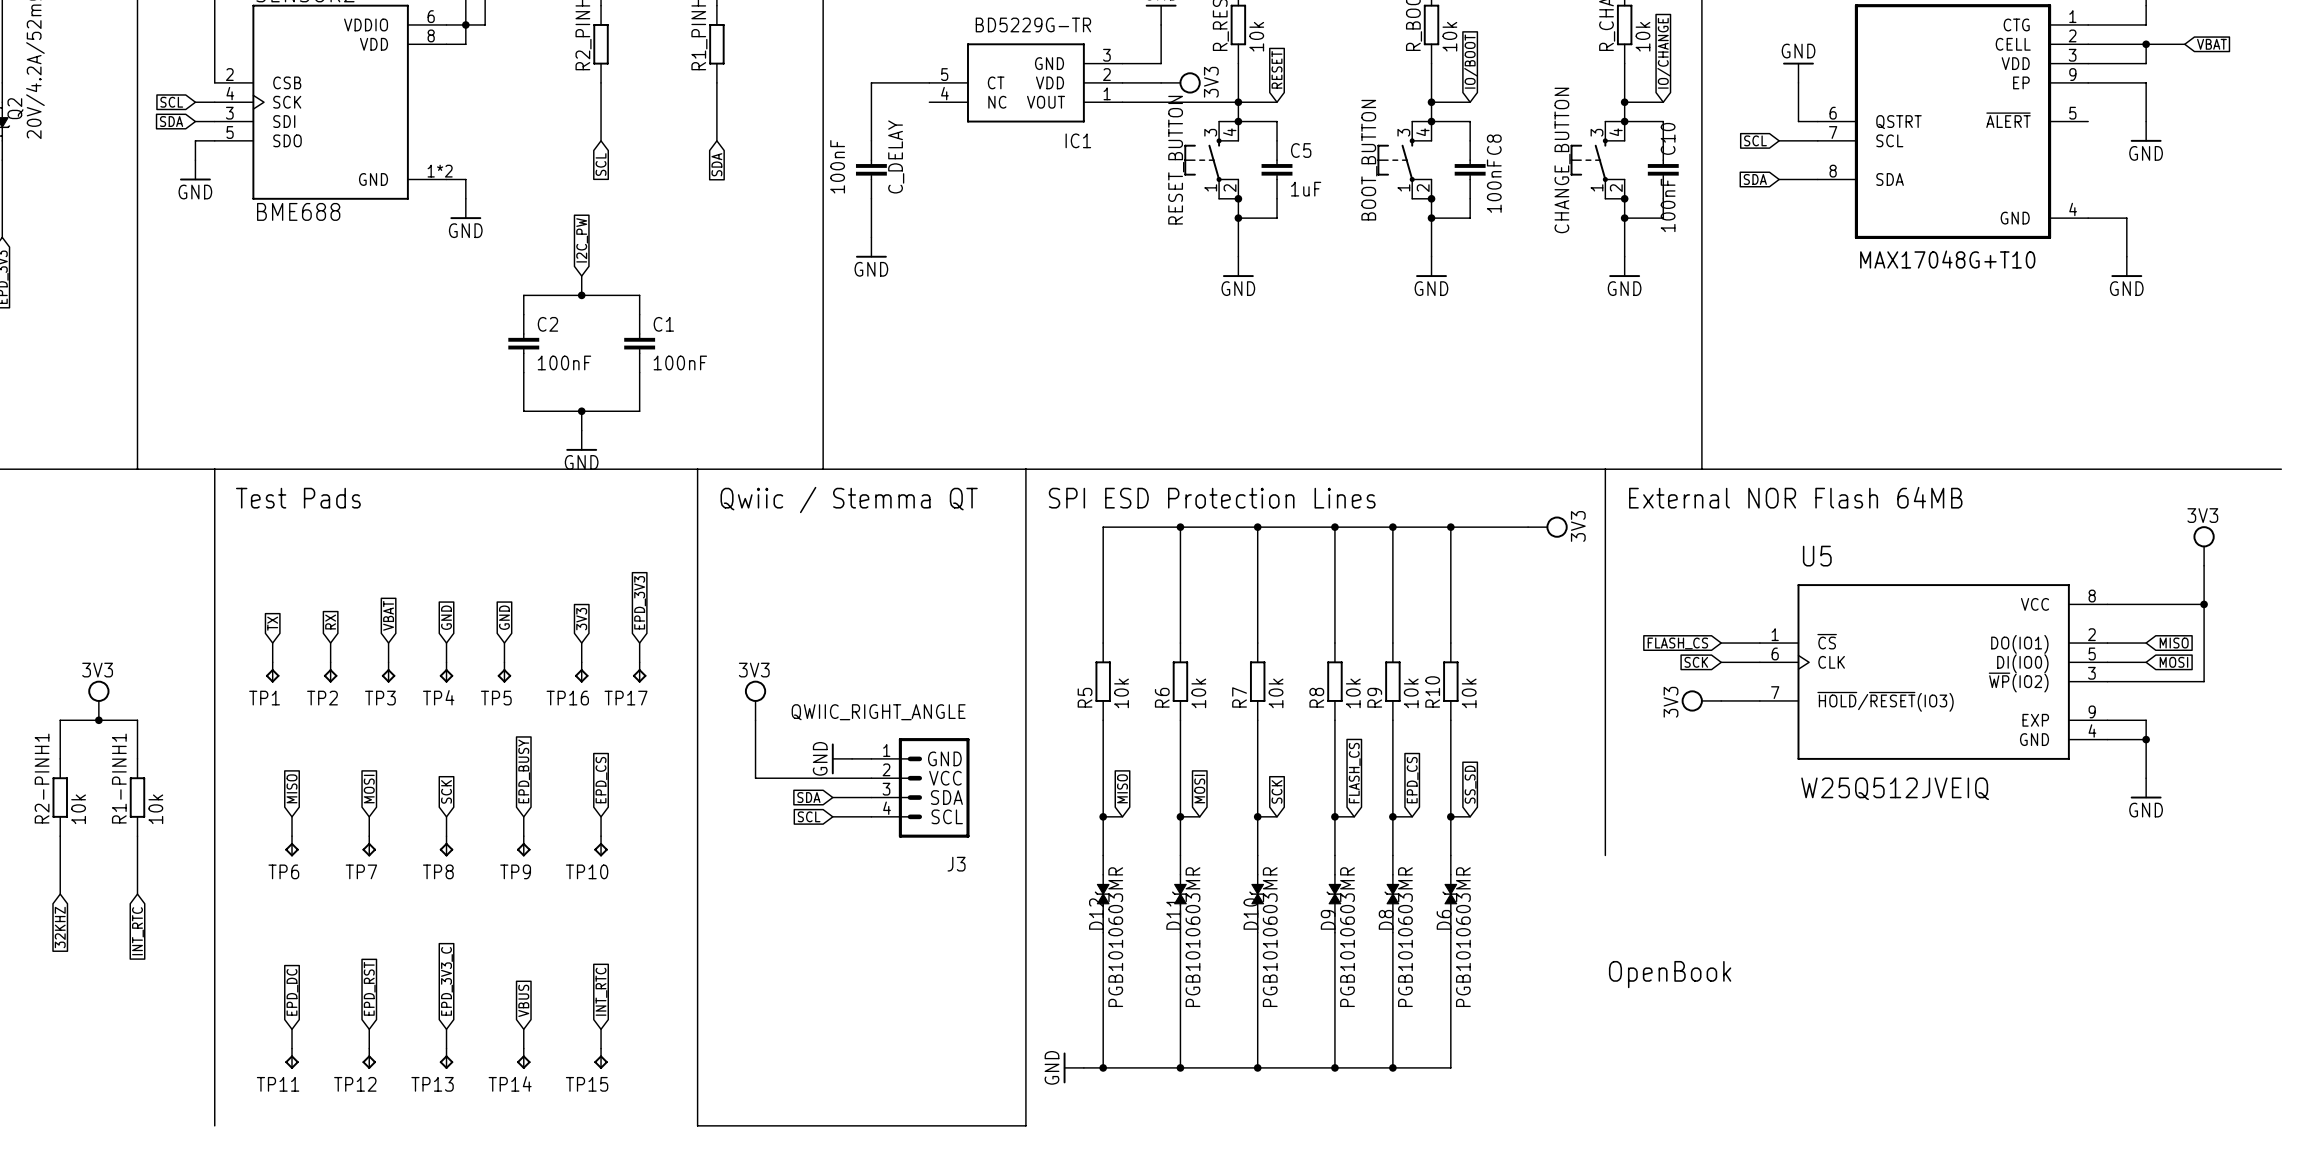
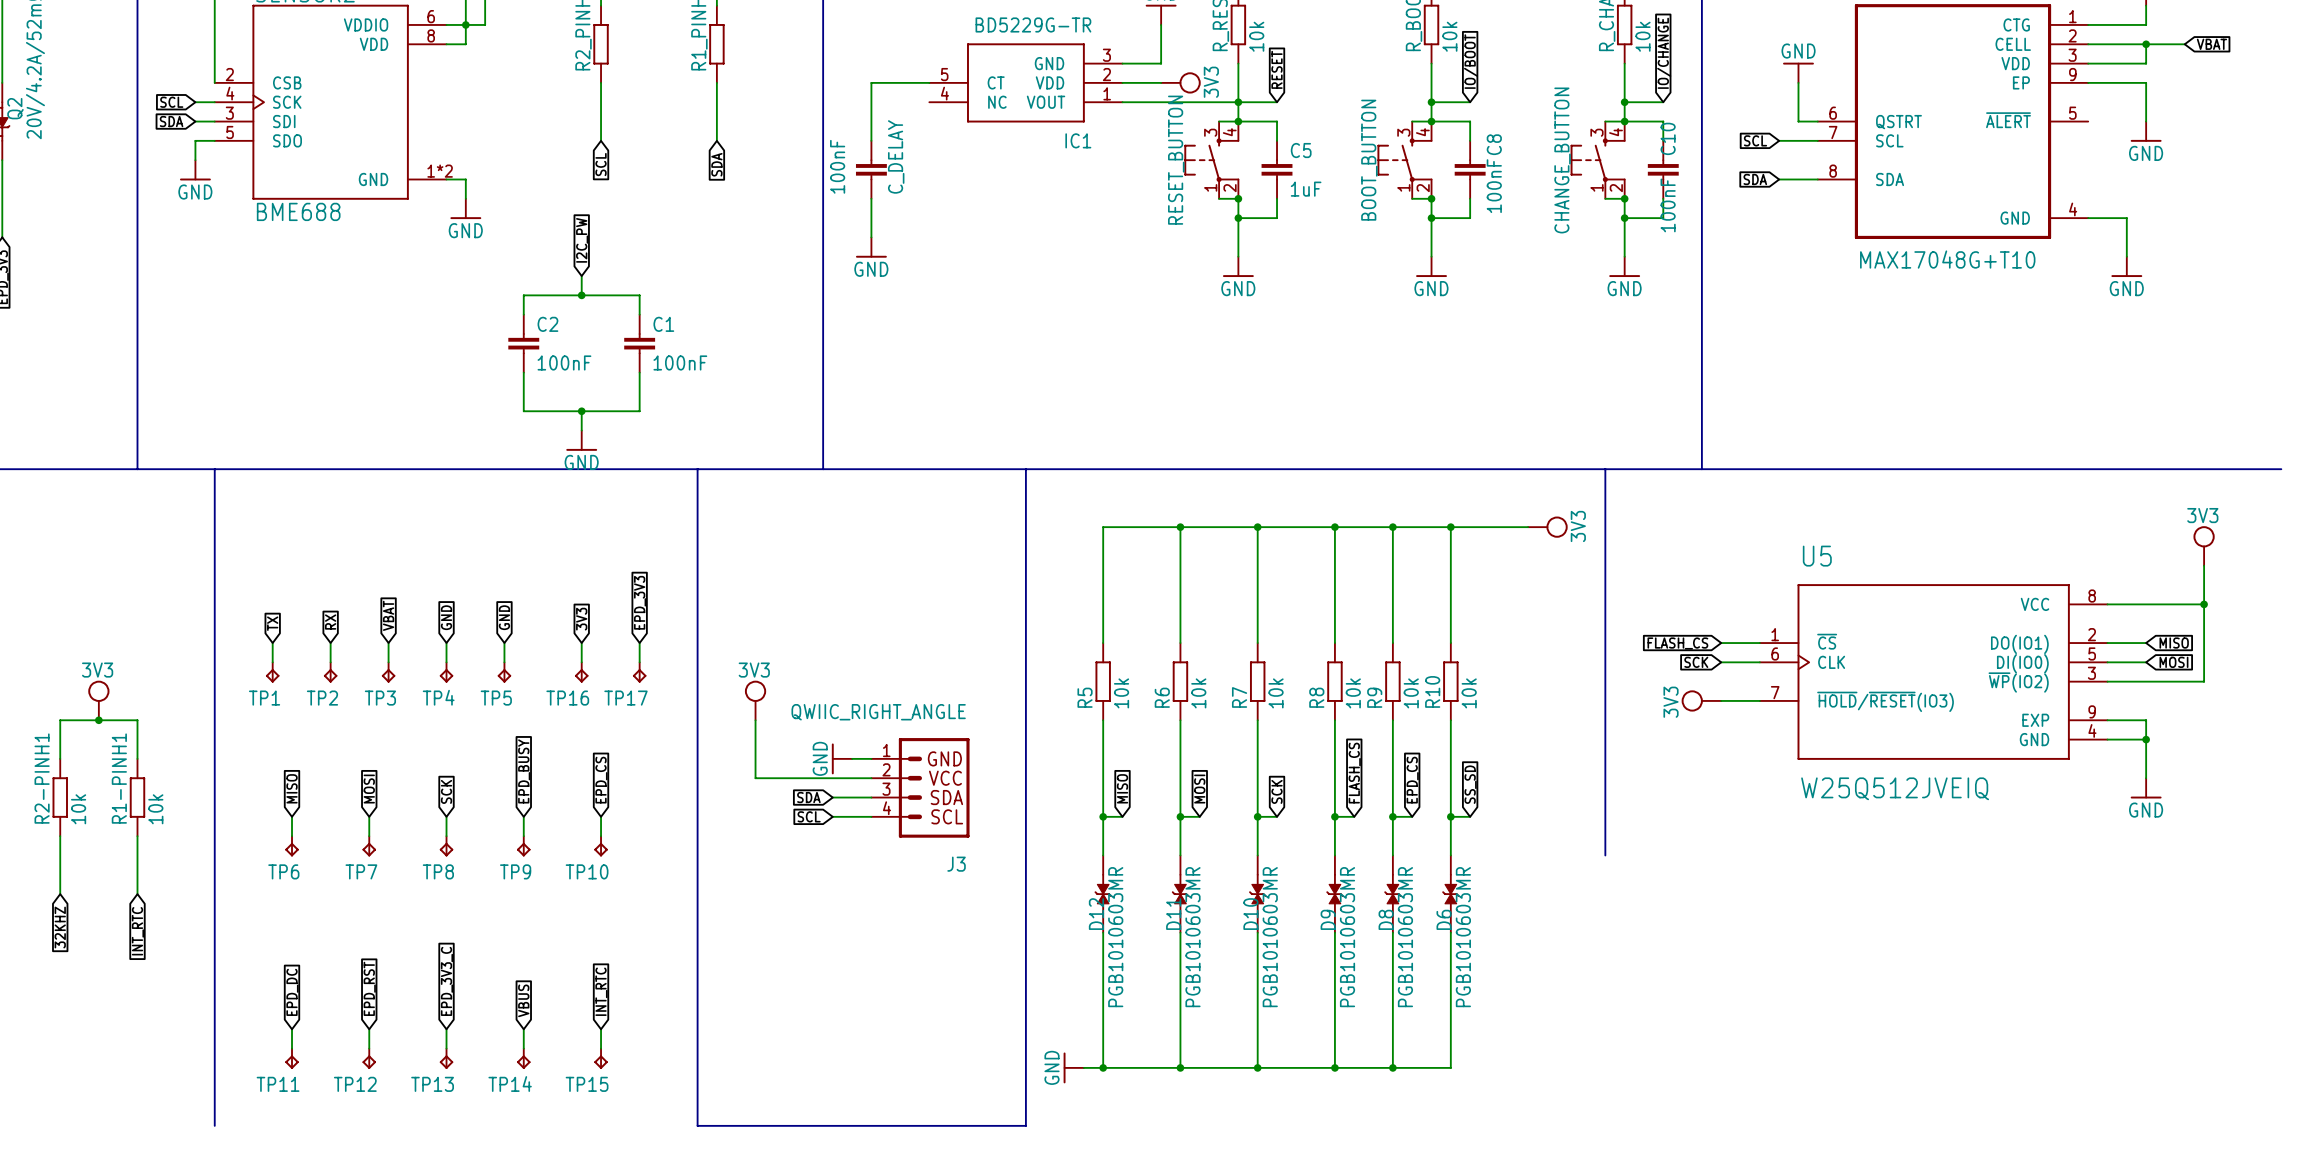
text: External NOR Flash 64MB (1795, 497) -> none
text: Test Pads (298, 498) -> none
text: SPI ESD Protection Lines (1212, 498) -> none
text: Qwiic / Stemma QT (849, 500) -> none
text: OpenBook (1670, 974) -> none

